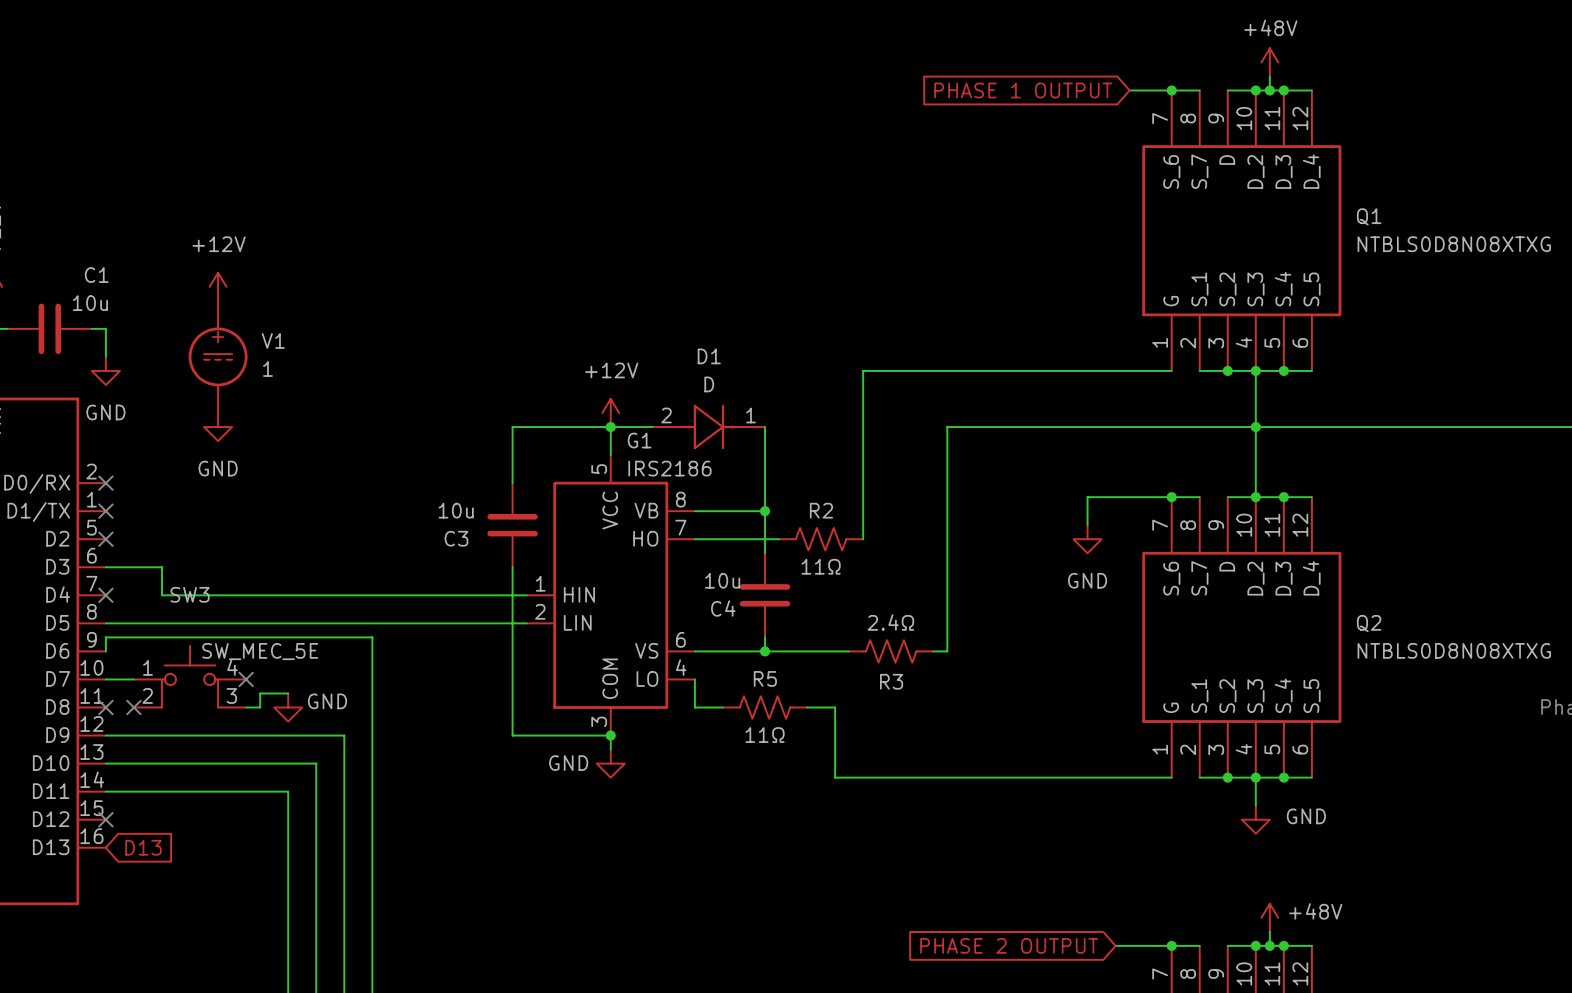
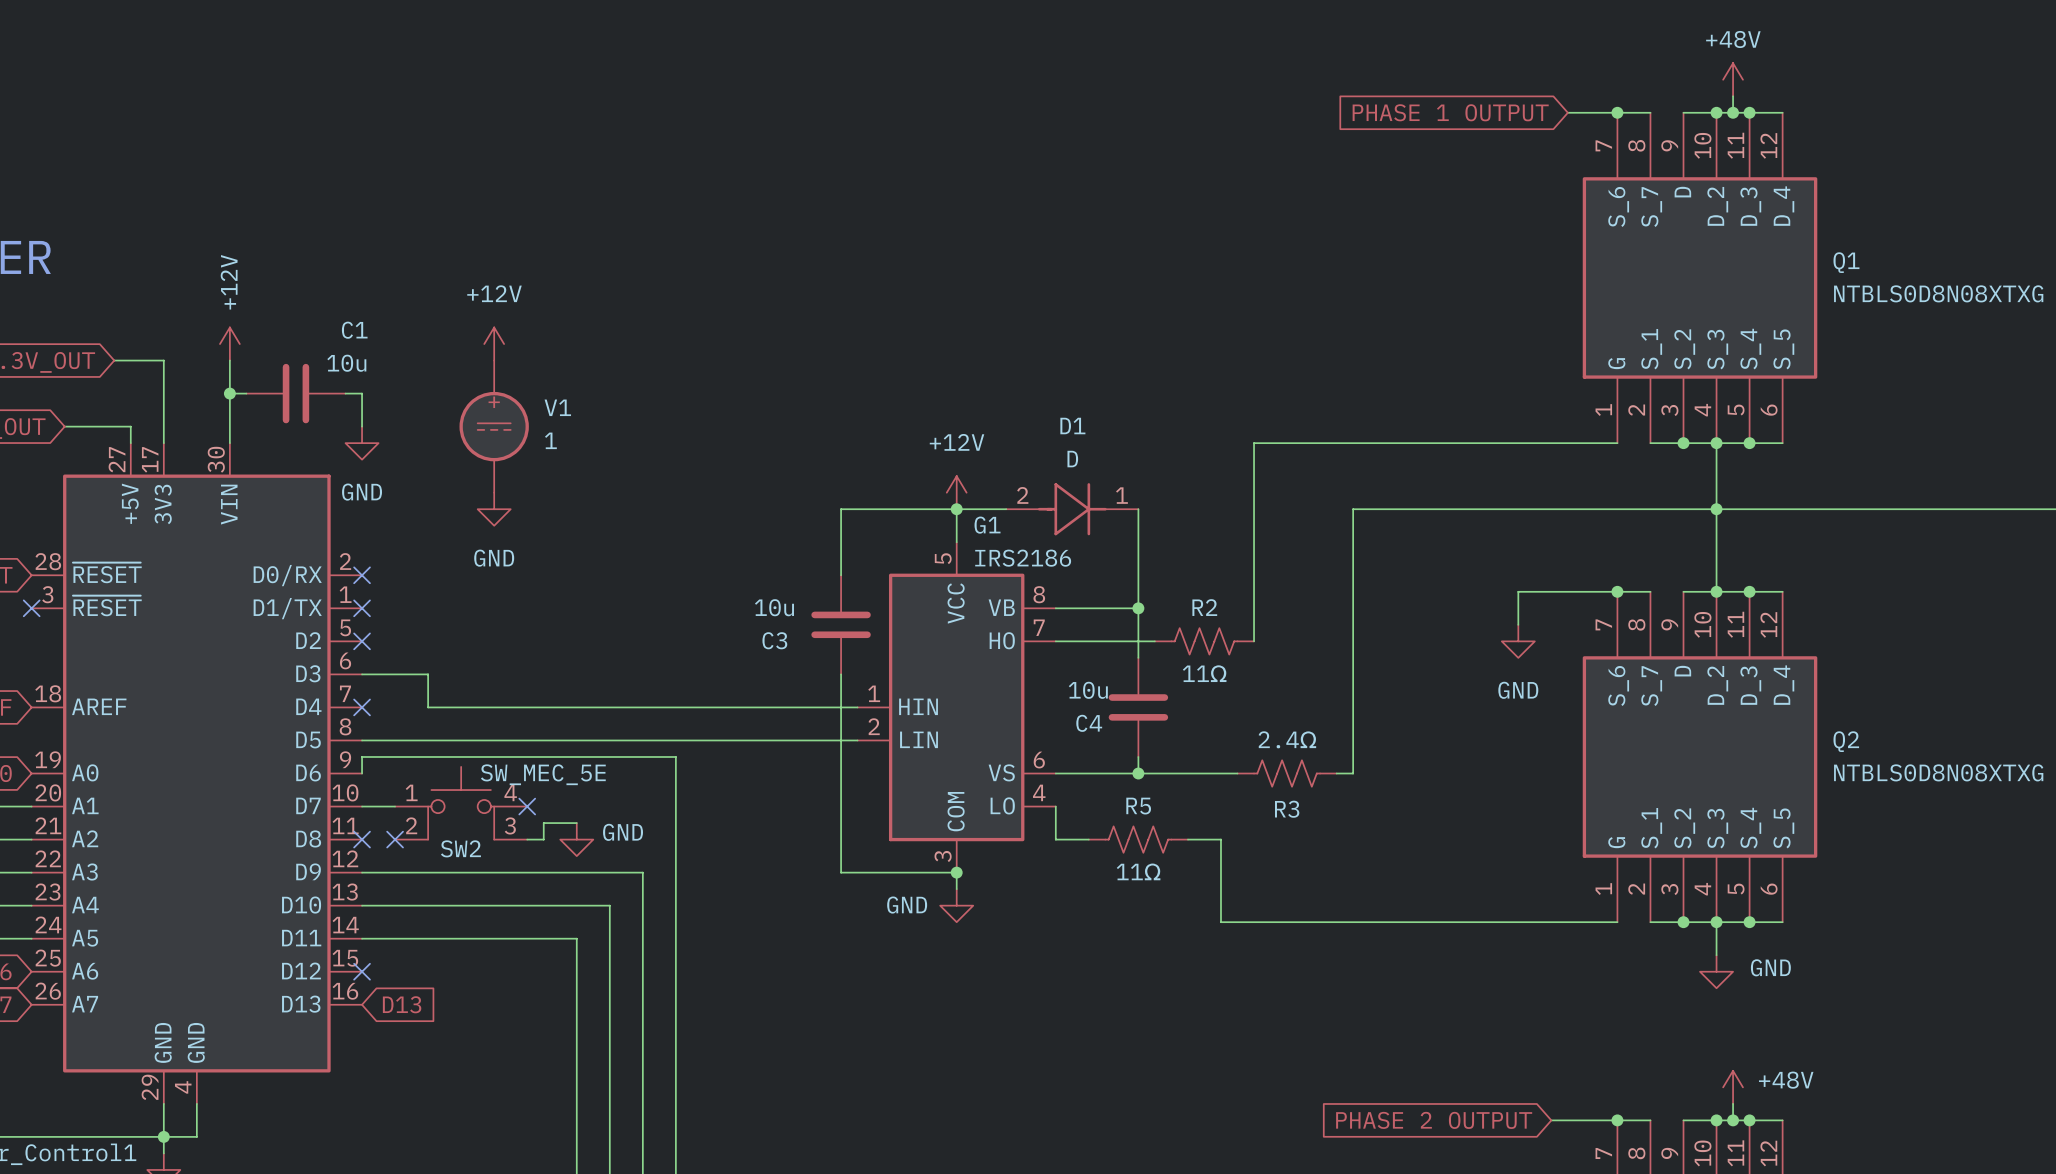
SW3 name: SW3 (190, 594) -> SW2 (460, 848)

